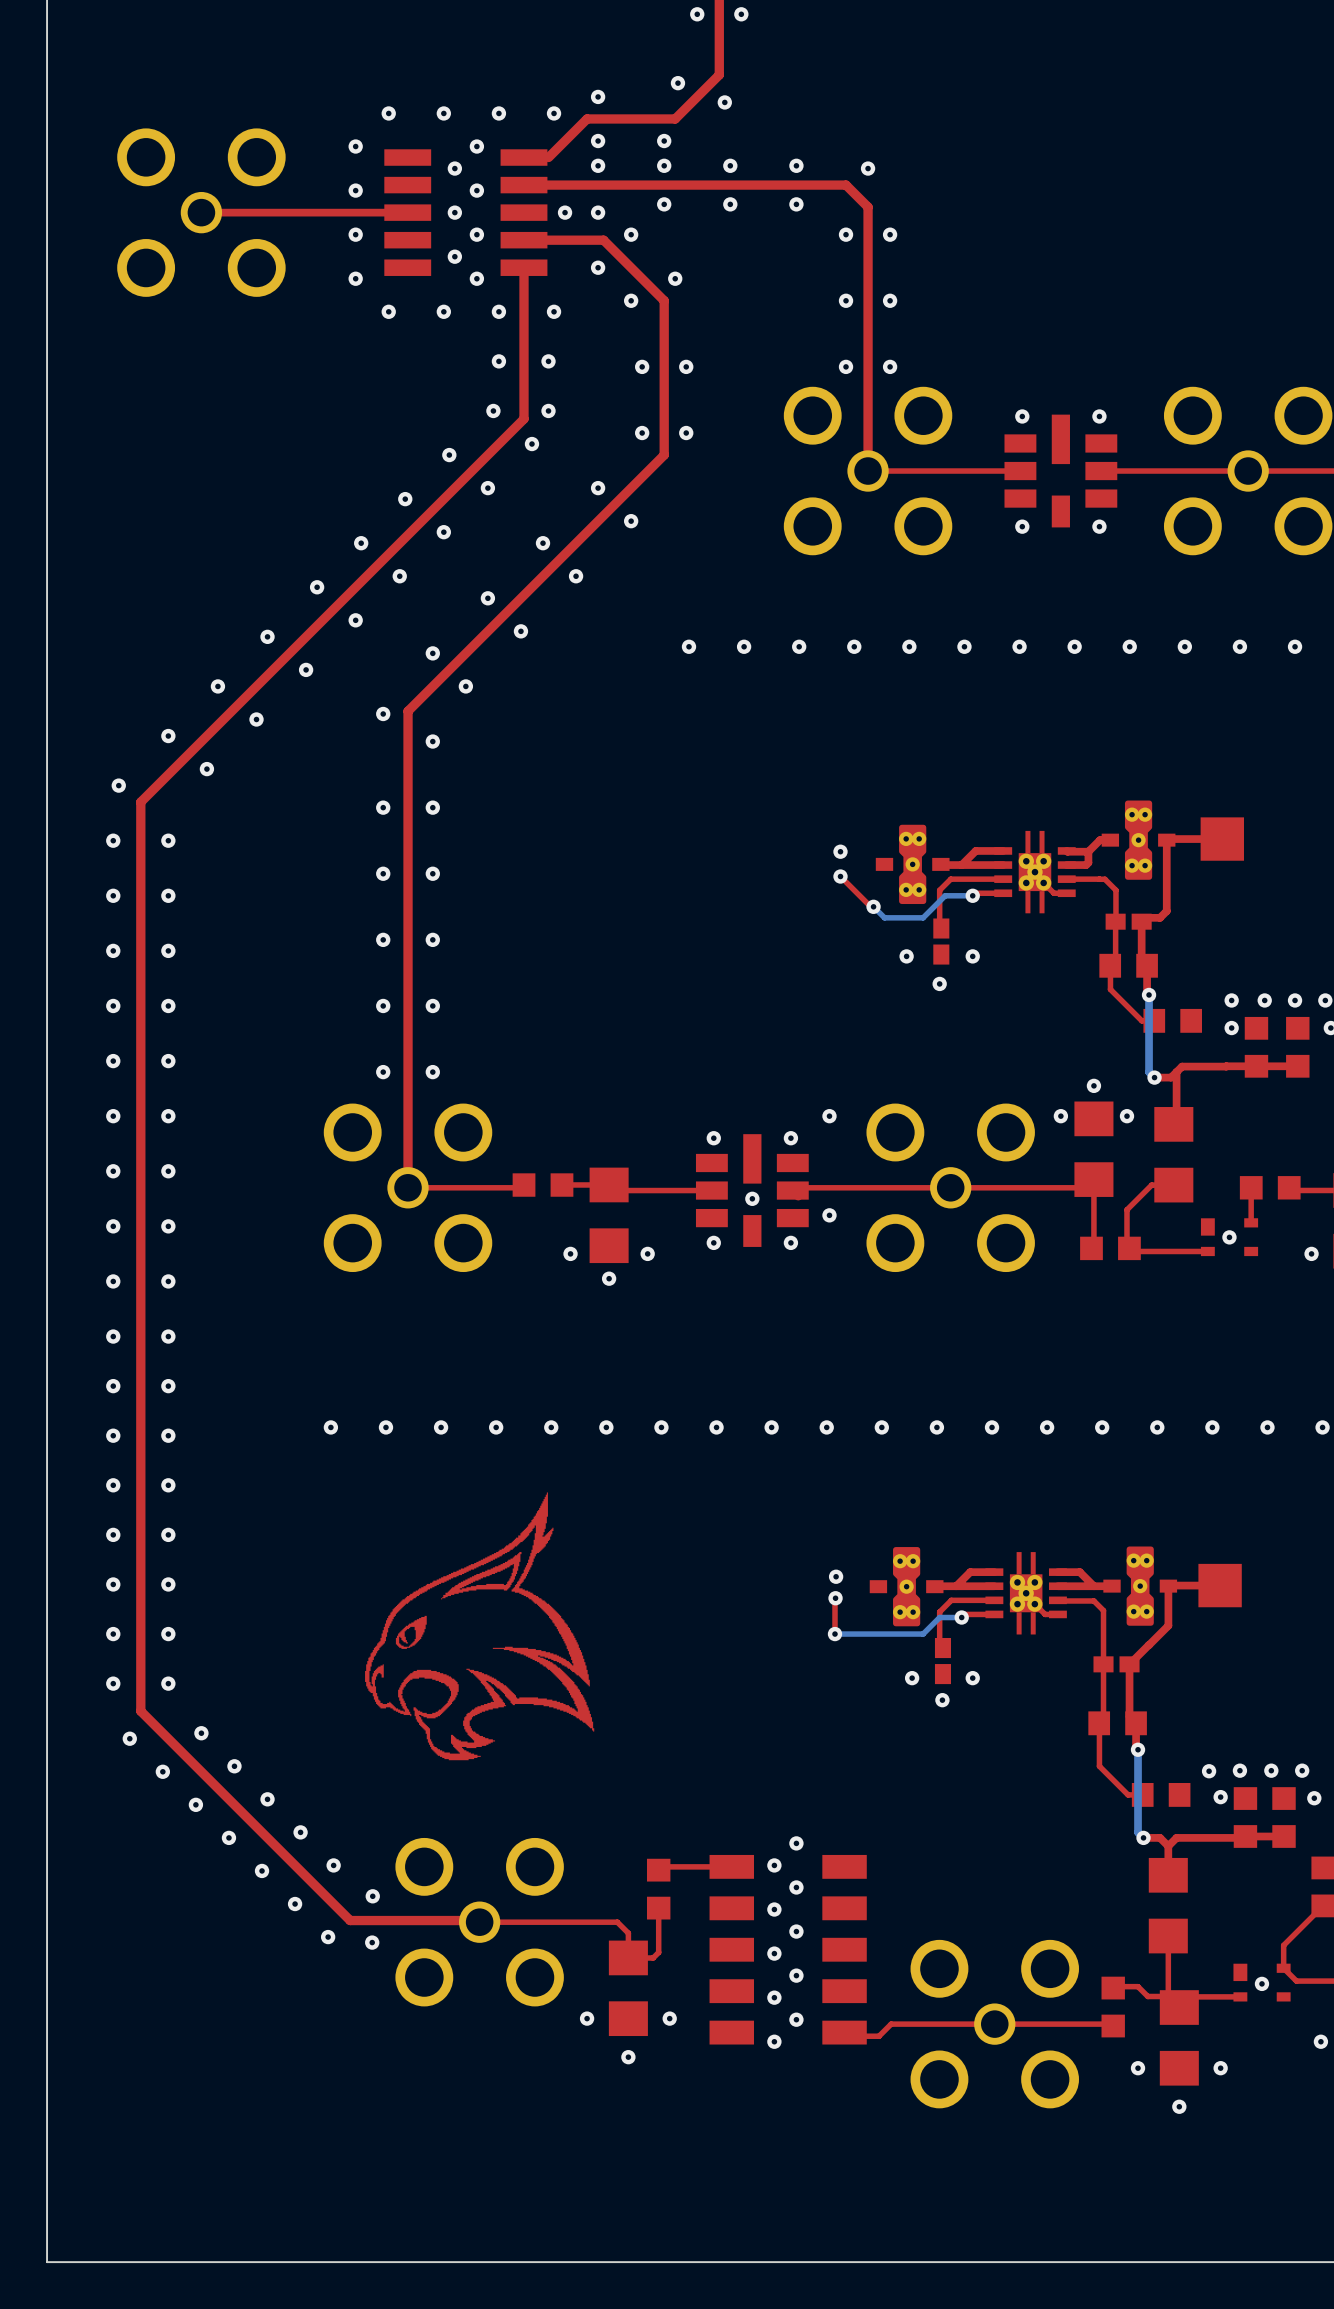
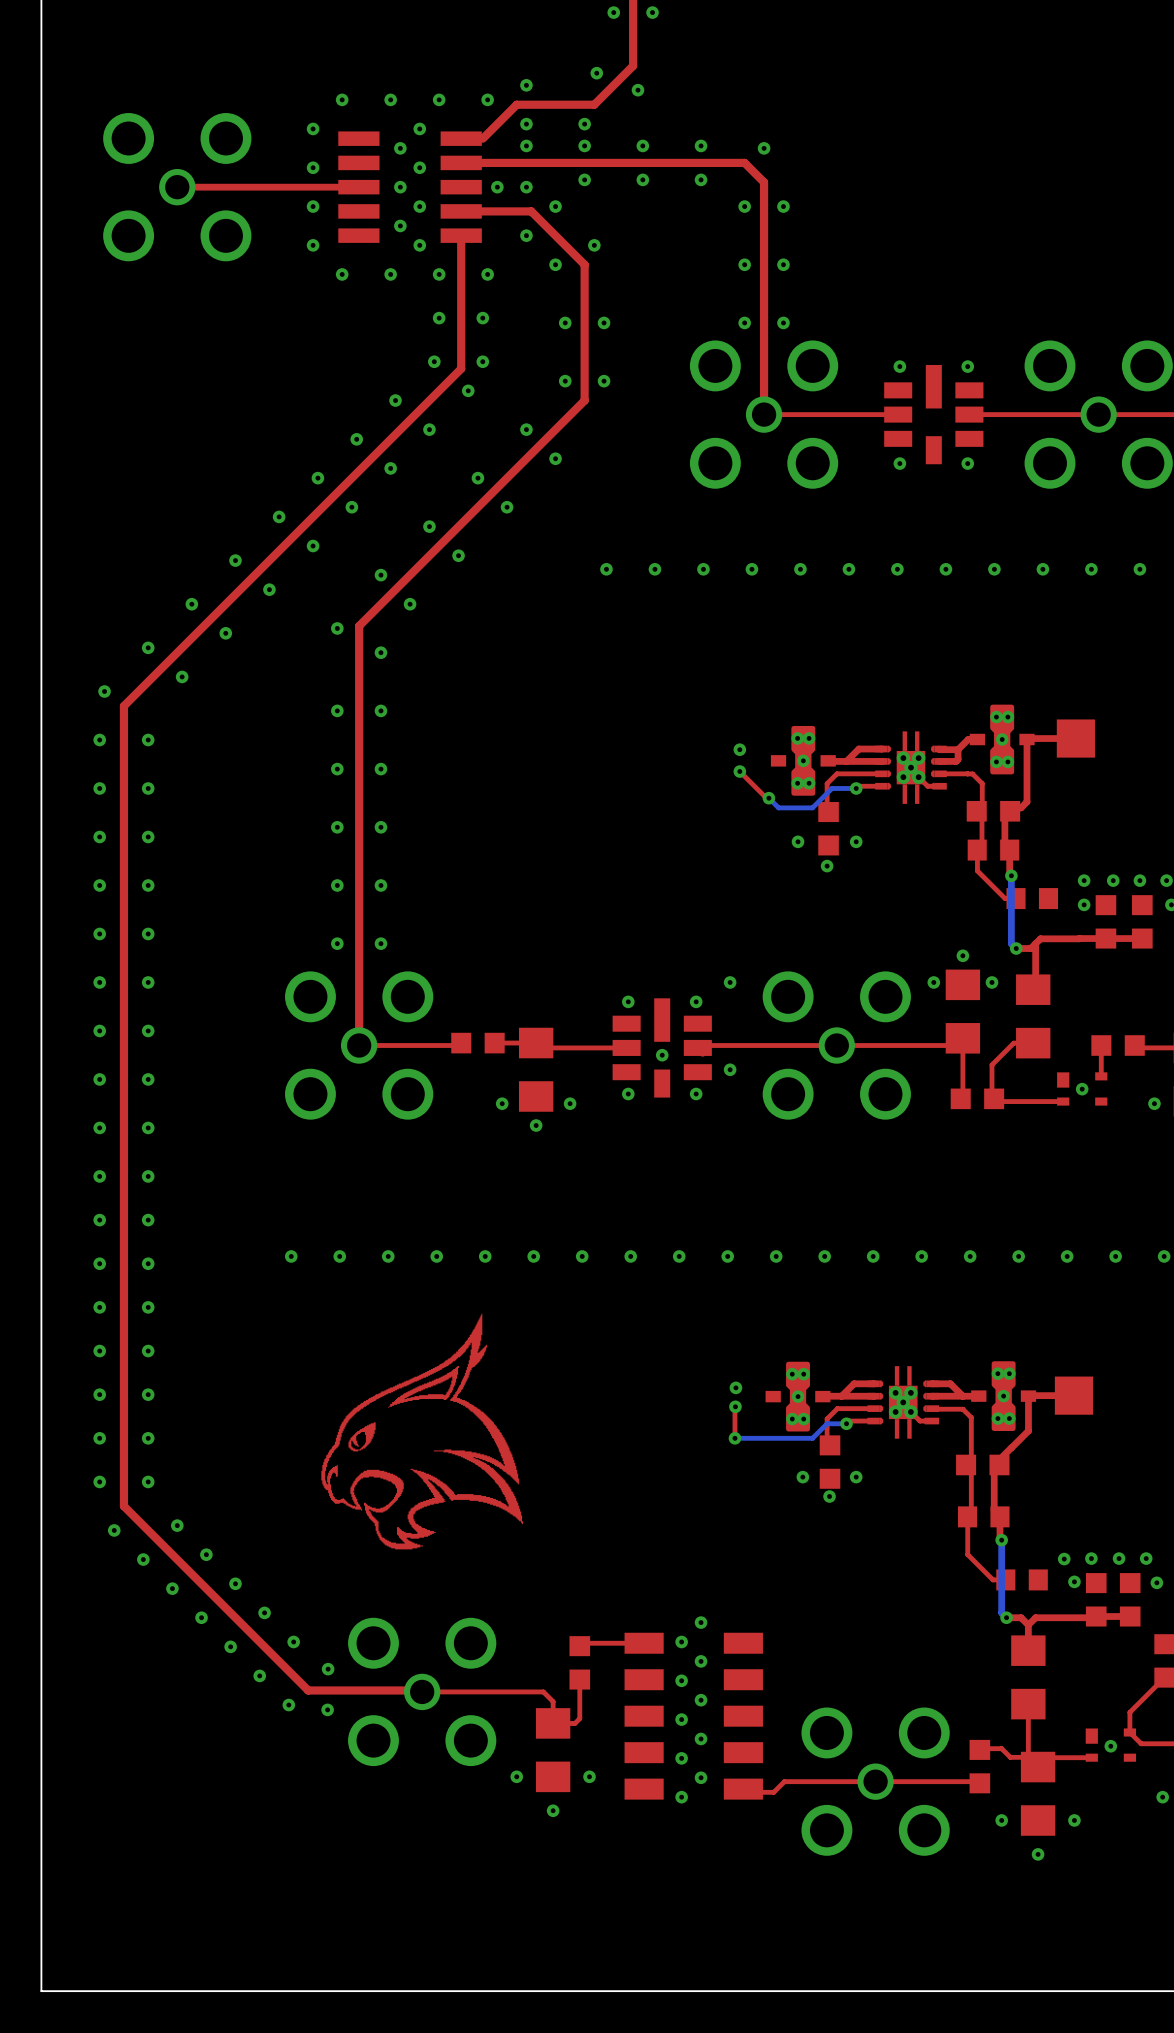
part footprint: [994, 830, 1076, 914] -> [875, 731, 947, 804]
part footprint: [1105, 913, 1152, 930] -> [966, 800, 1021, 822]
part footprint: [933, 918, 950, 965] -> [818, 802, 839, 856]
part footprint: [985, 1552, 1067, 1635] -> [867, 1366, 940, 1439]
part footprint: [934, 1638, 952, 1685] -> [819, 1435, 841, 1489]
part footprint: [1093, 1656, 1140, 1673] -> [956, 1454, 1010, 1476]

